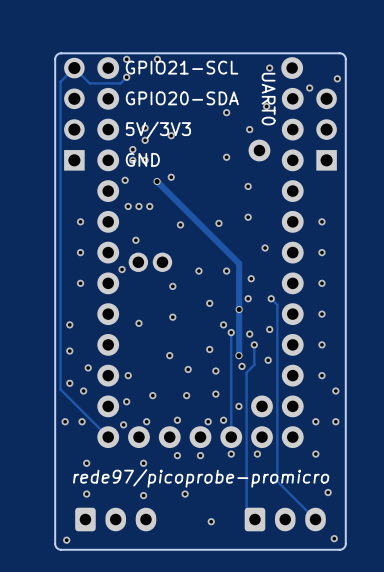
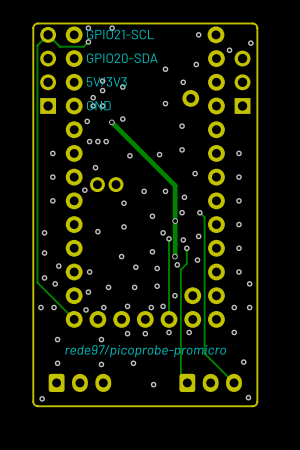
text: UART0 (268, 99) -> none

